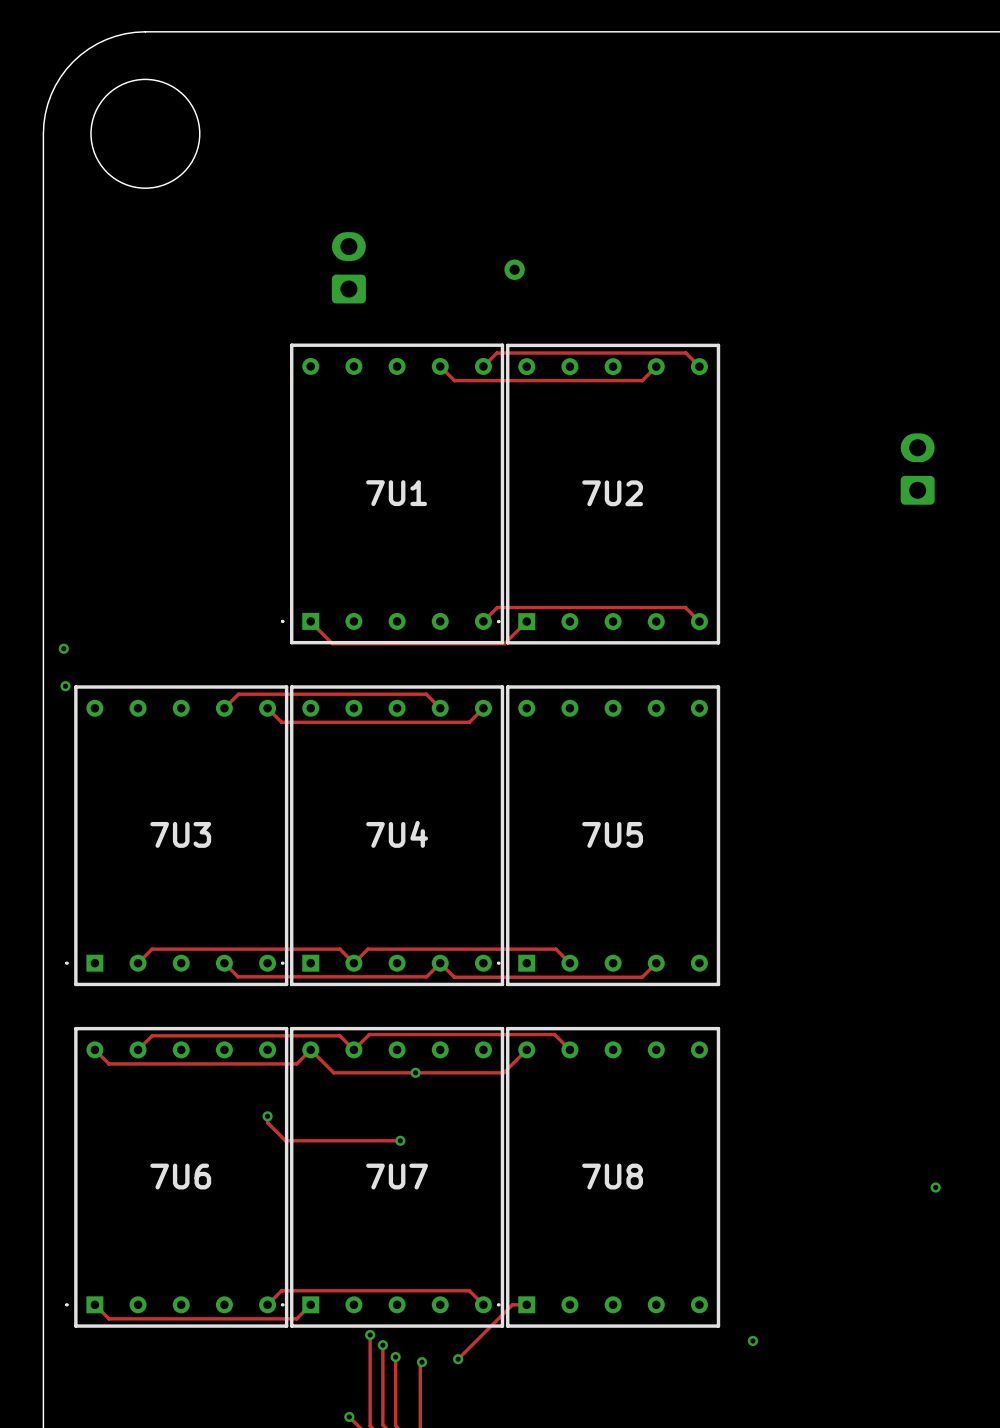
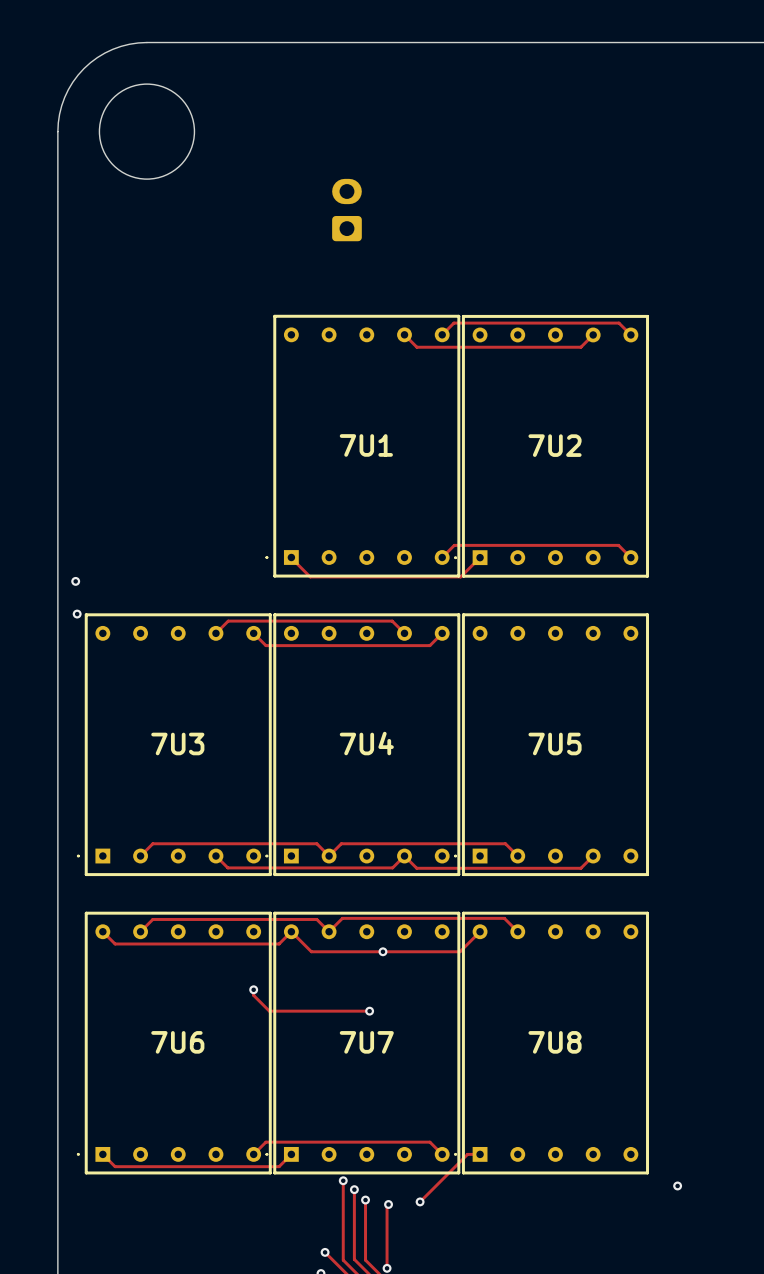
part position: (348, 267) -> (346, 210)
via: (514, 269) -> none

